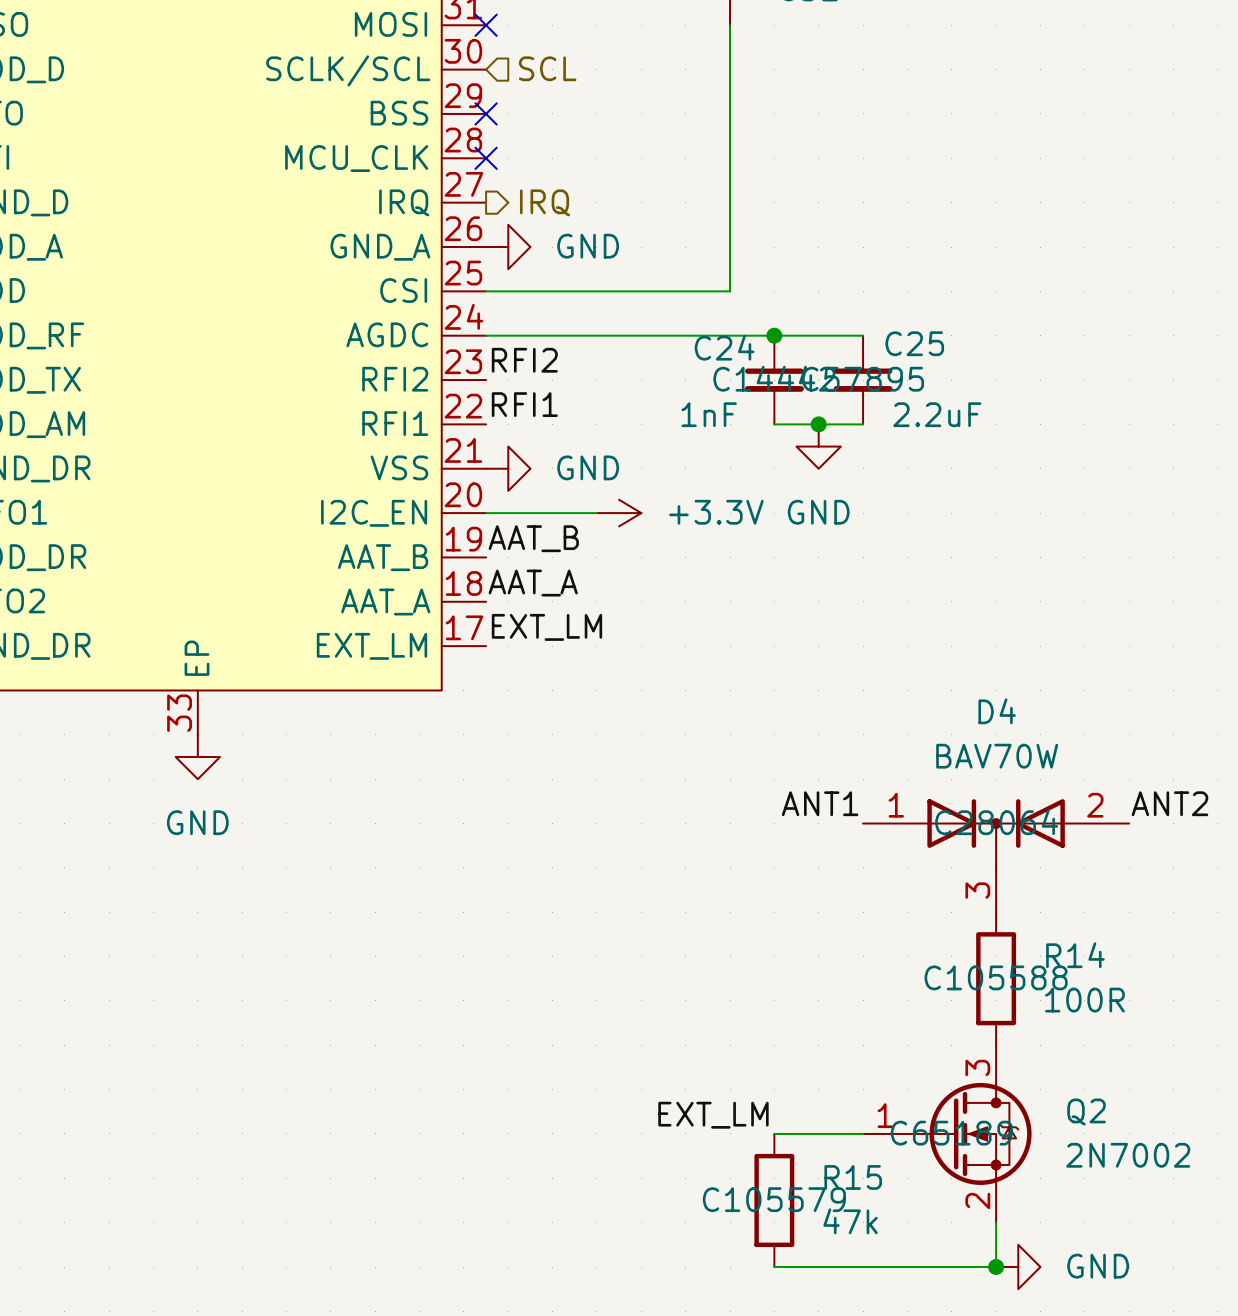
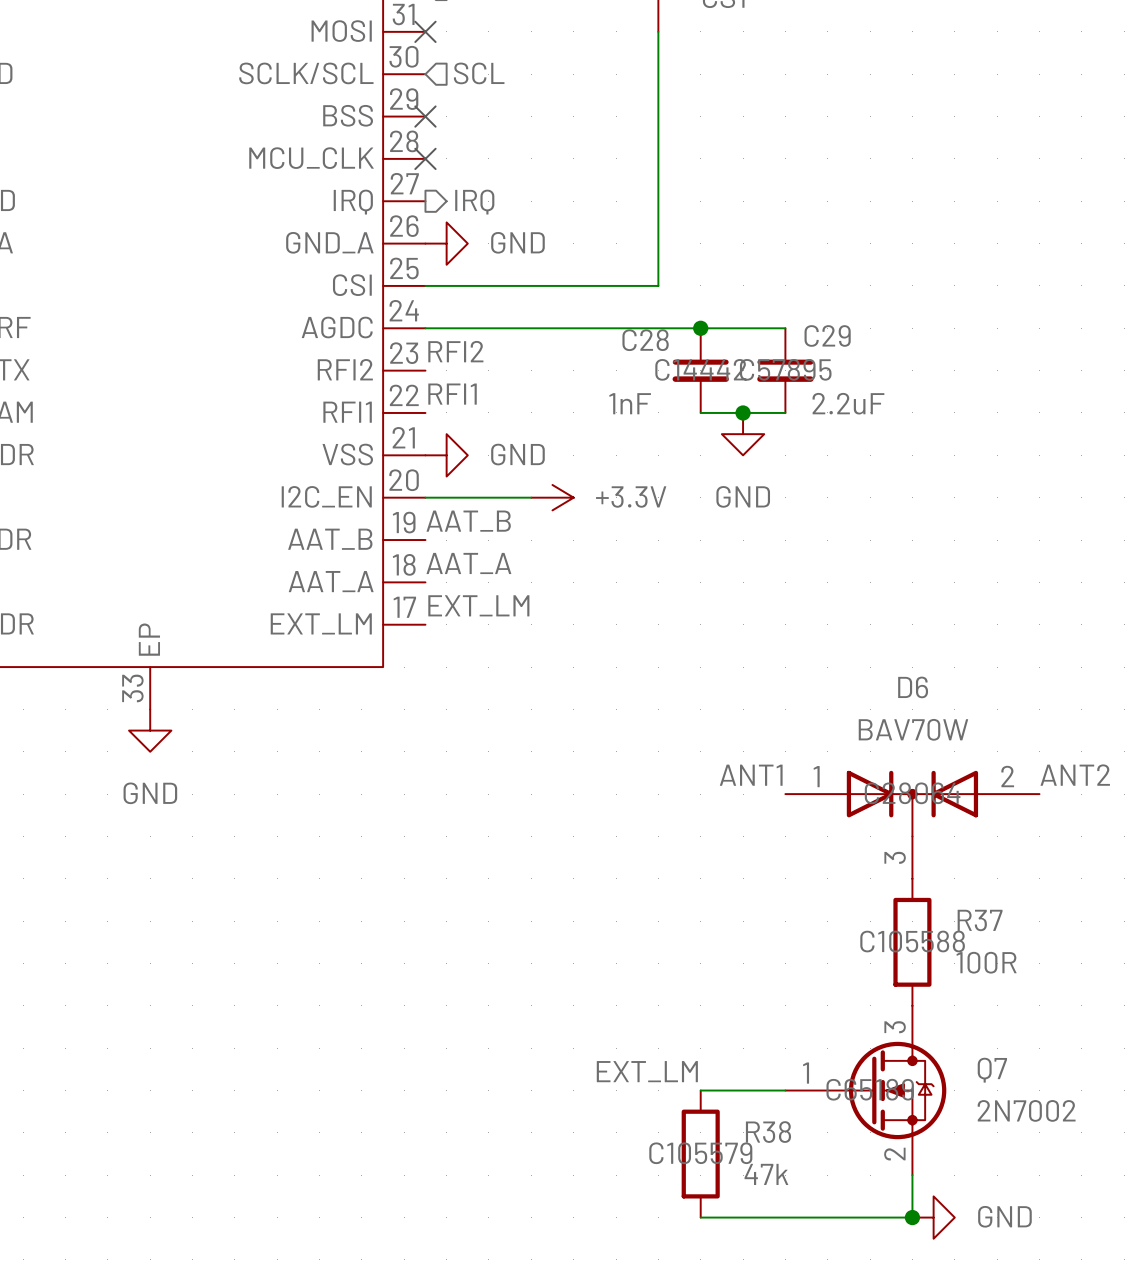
C25 name: C25 (914, 343) -> C29 (827, 335)
C24 name: C24 (724, 347) -> C28 (645, 340)
D4 name: D4 (997, 711) -> D6 (913, 687)
R14 name: R14 (1075, 955) -> R37 (980, 920)
Q2 name: Q2 (1086, 1112) -> Q7 (992, 1070)
R15 name: R15 (853, 1177) -> R38 (768, 1132)

